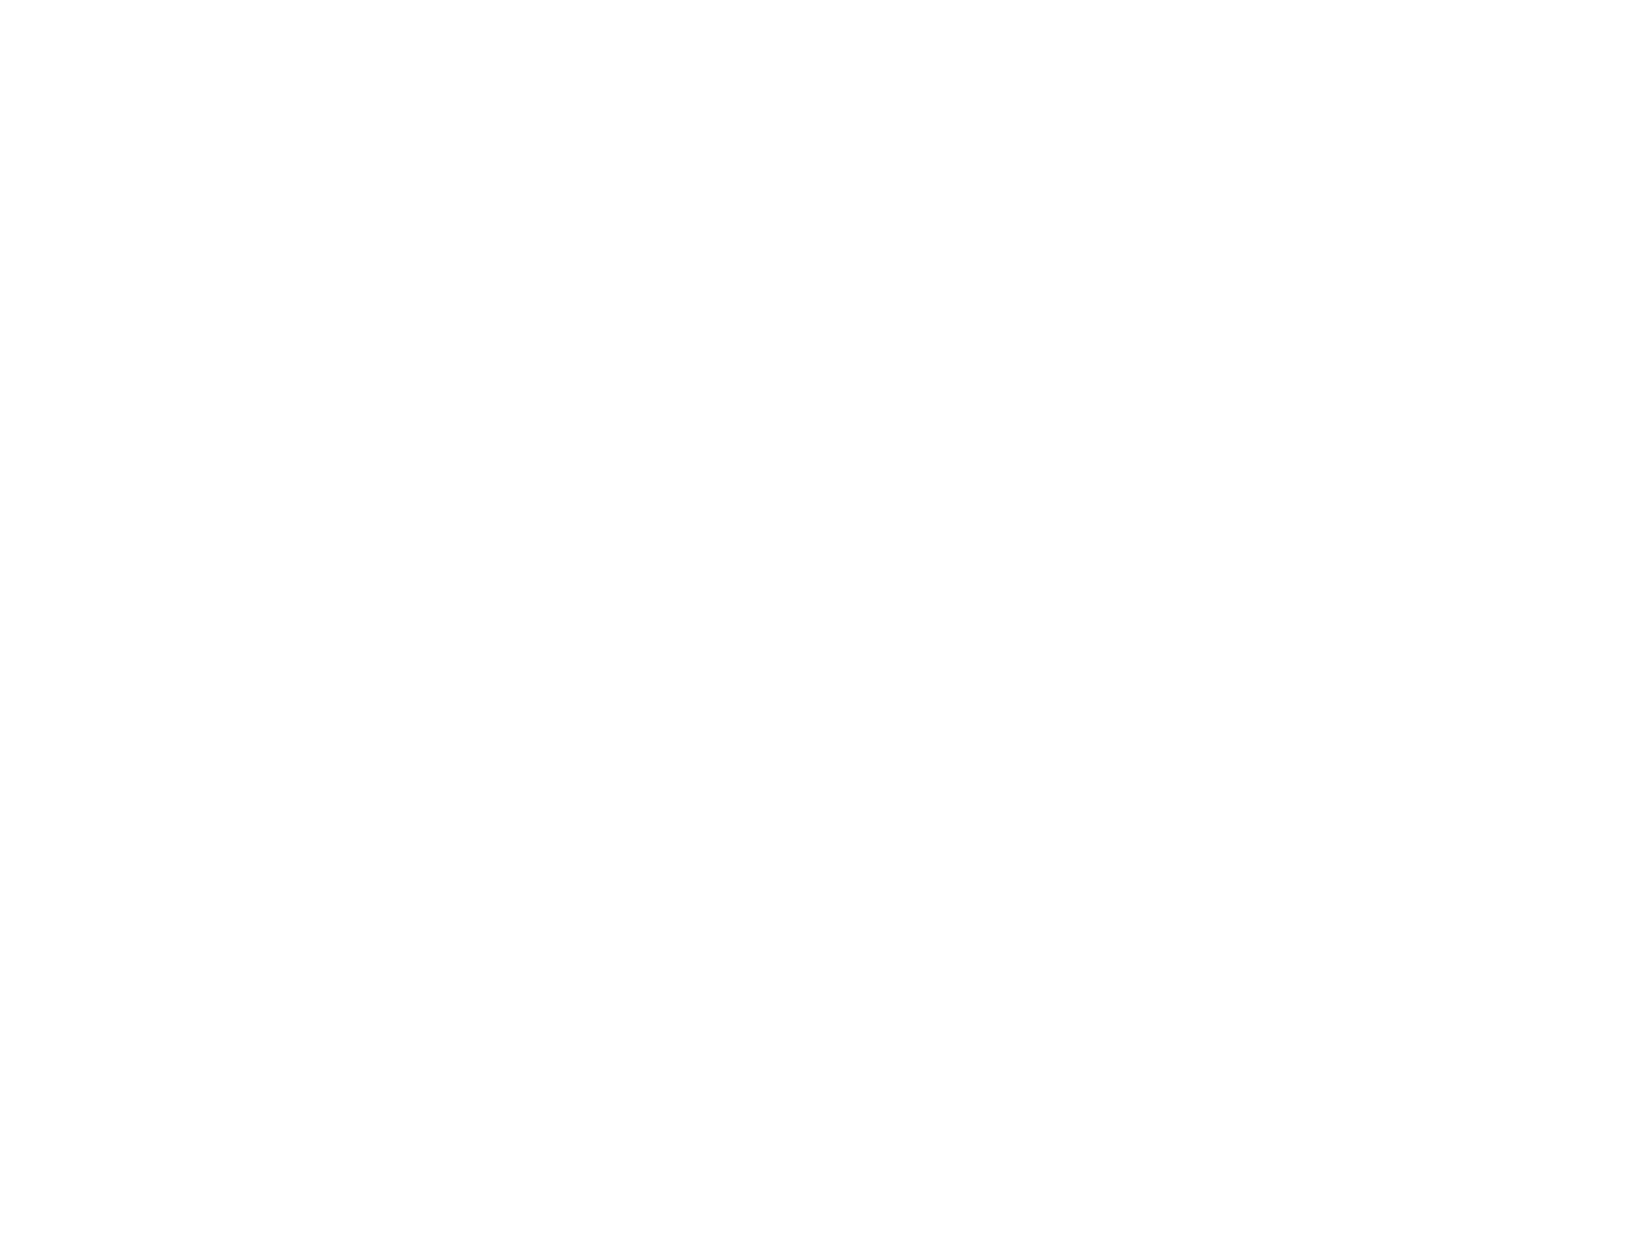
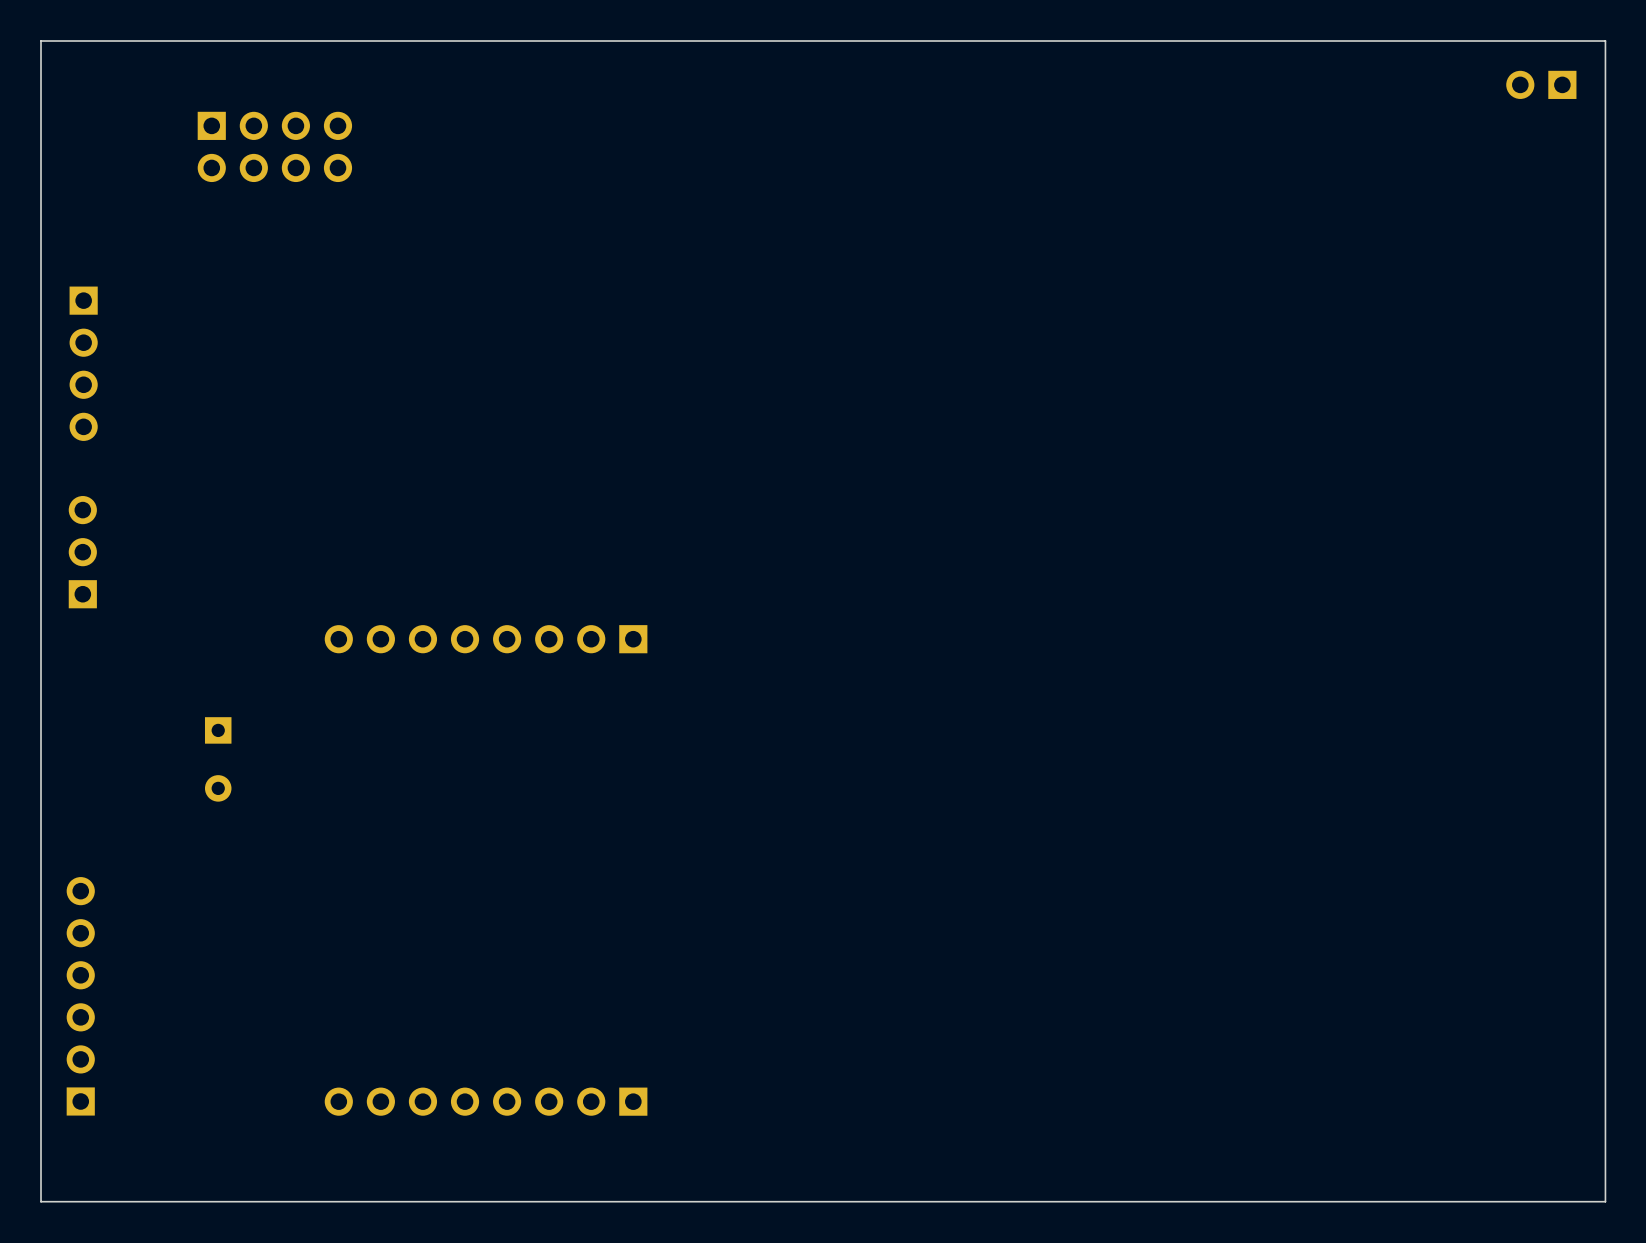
board edge: none -> (1605, 41) (41, 41) (41, 1201) (1605, 1201) (1605, 41)
part: none -> (1541, 84)
part: none -> (274, 146)
part: none -> (83, 363)
part: none -> (82, 552)
part: none -> (486, 639)
part: none -> (218, 759)
part: none -> (80, 996)
part: none -> (486, 1101)

